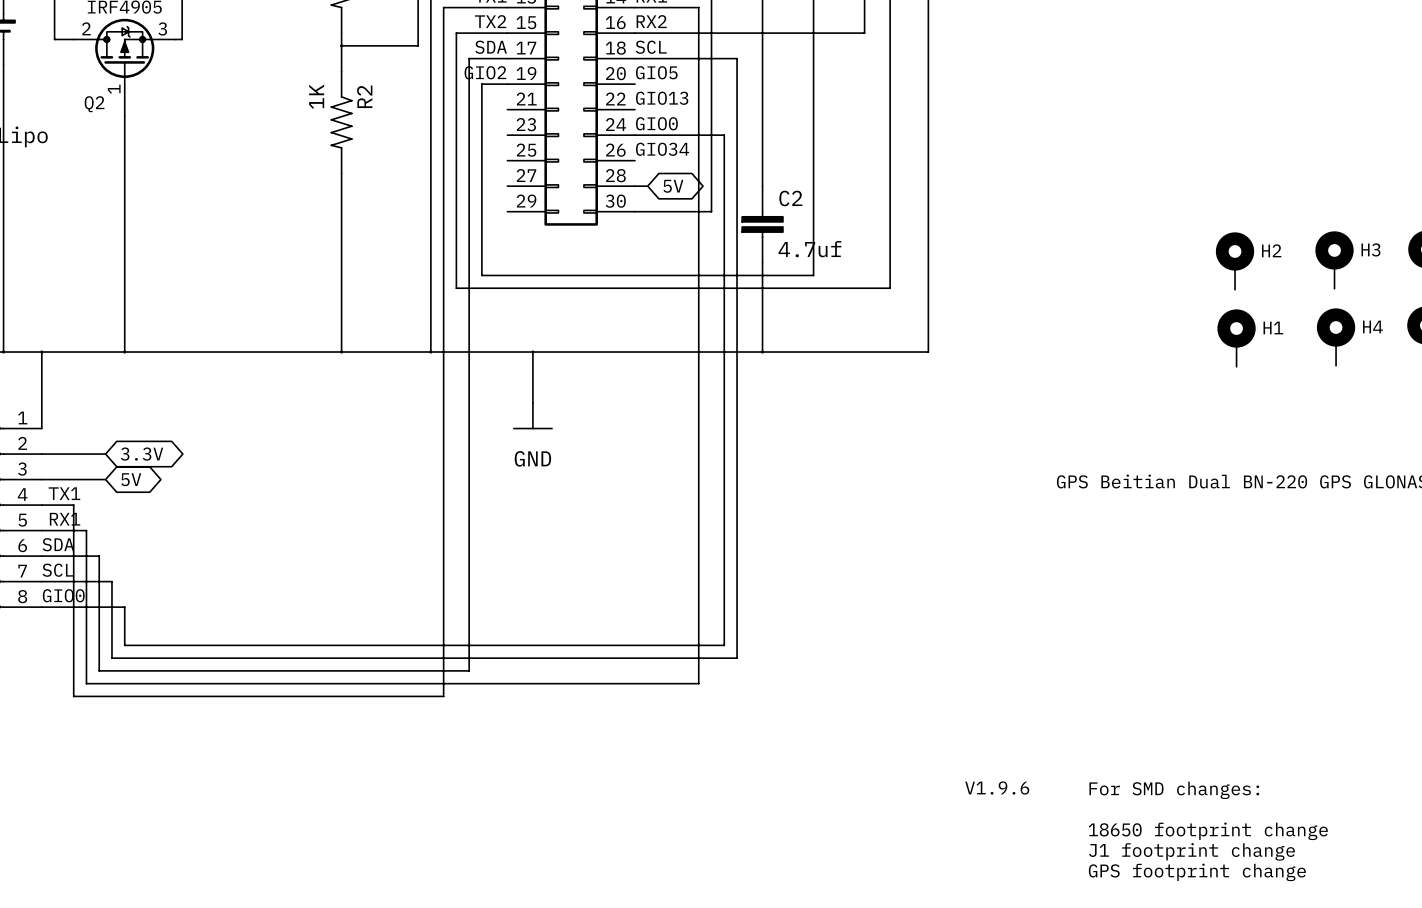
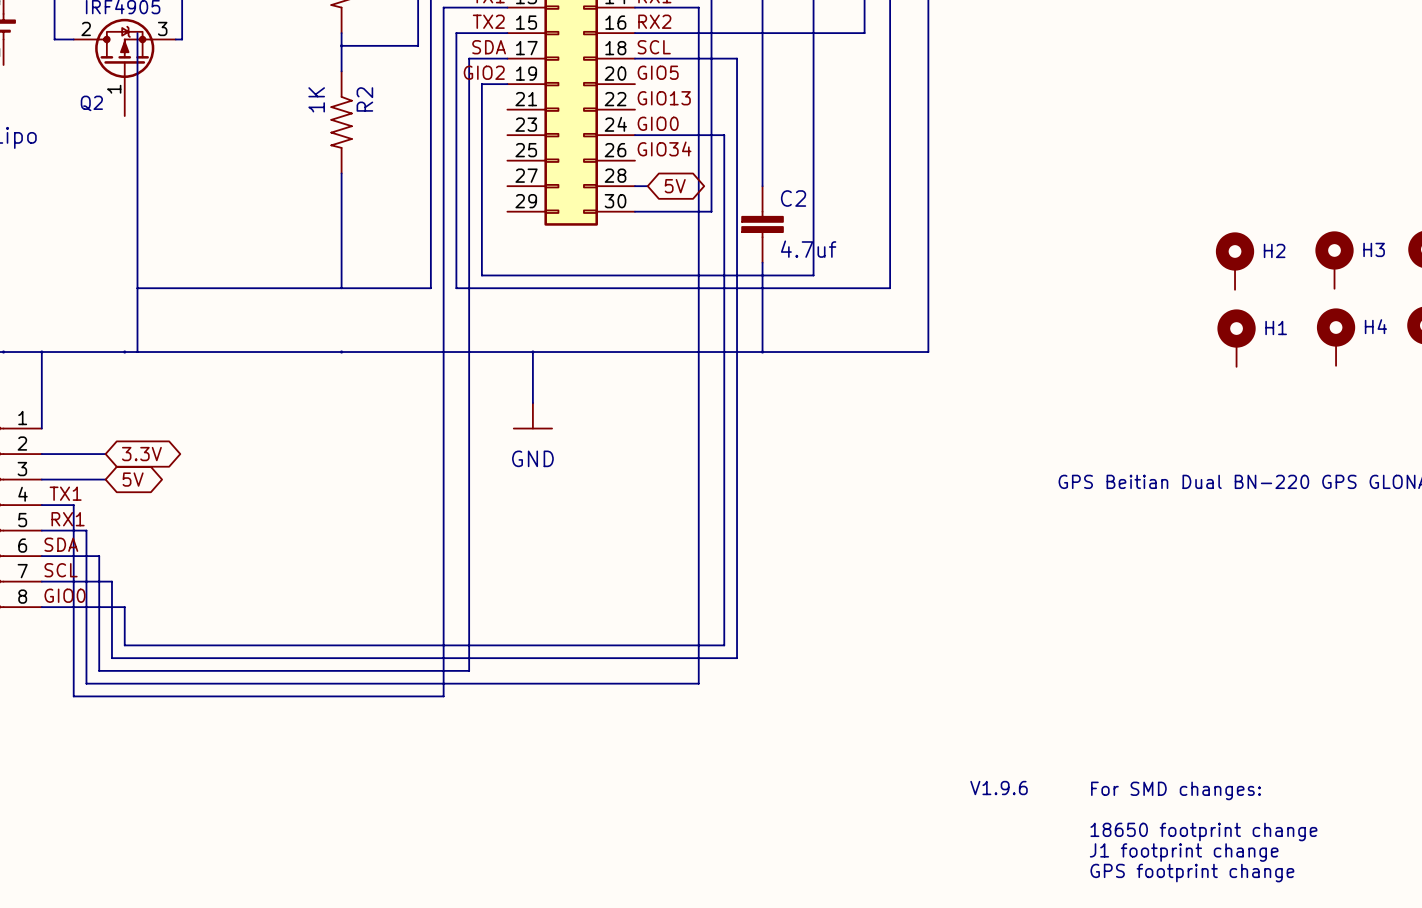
wire: none -> (137, 33) (137, 352)
wire: (3, 64) (3, 352) -> none
wire: (124, 116) (124, 352) -> none
wire: (341, 288) (341, 352) -> none
wire: (430, 288) (430, 352) -> (430, 288) (137, 288)

